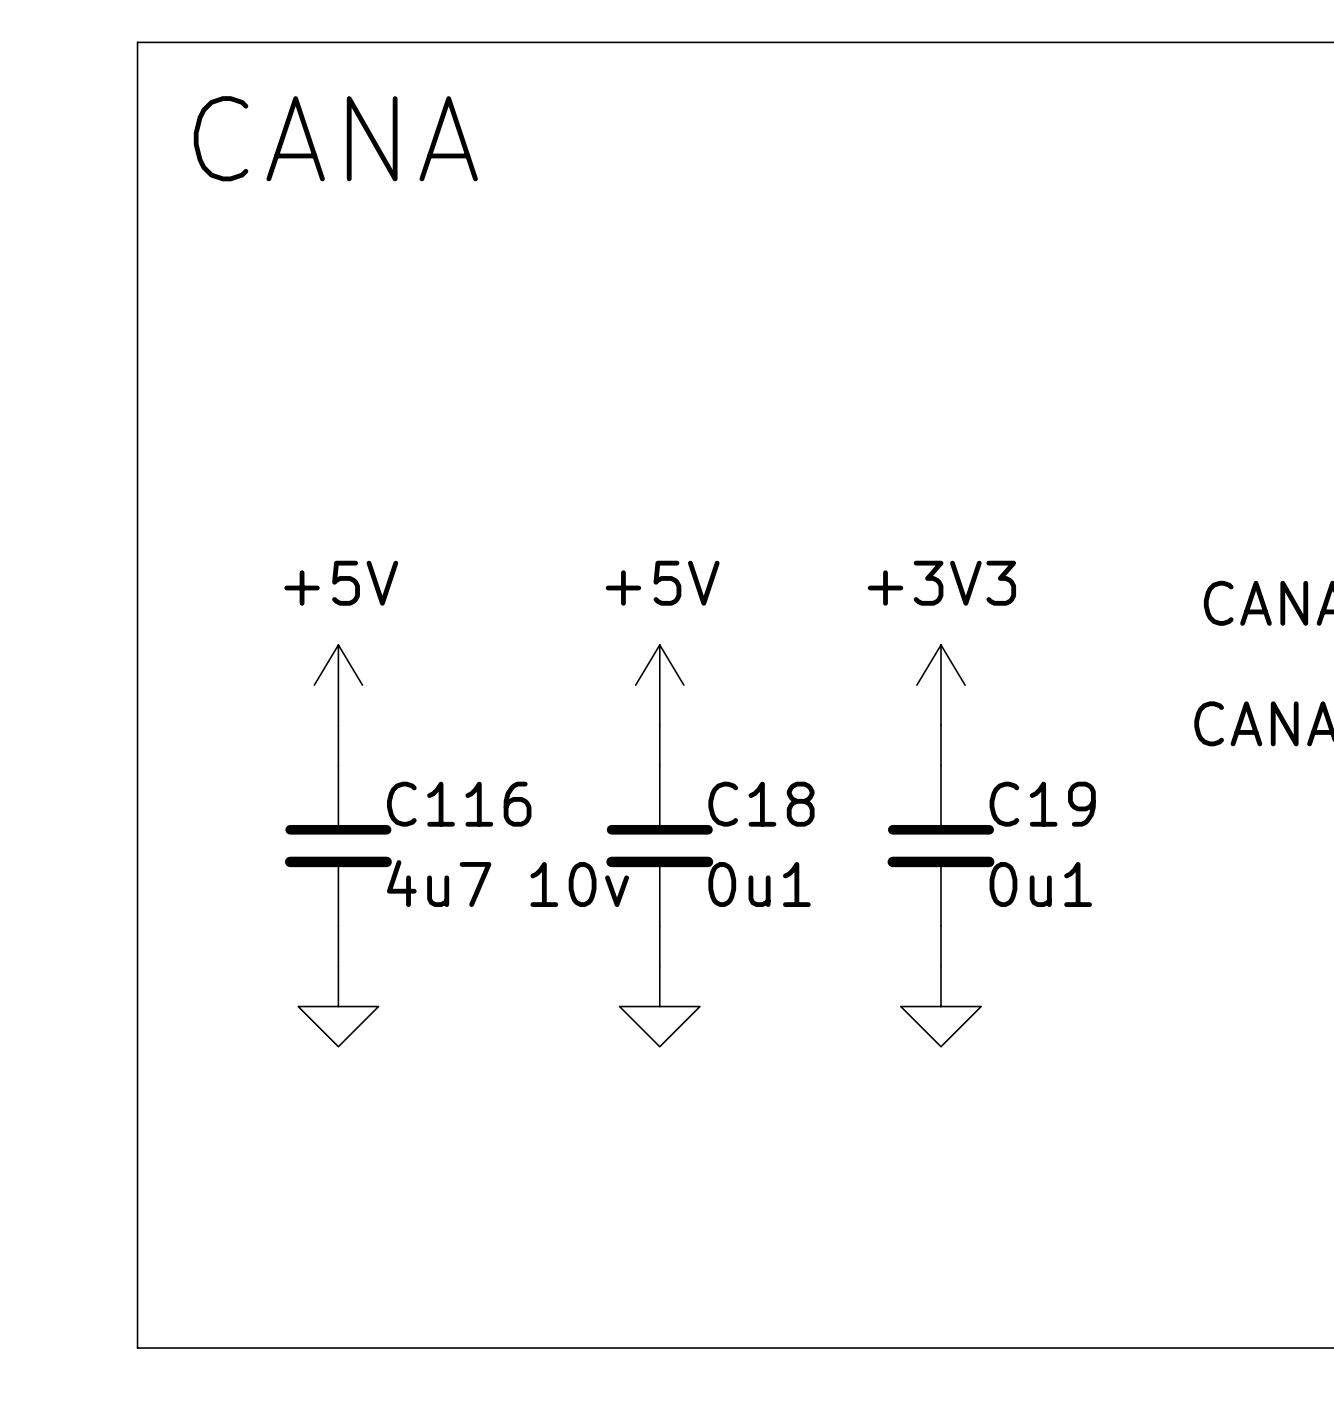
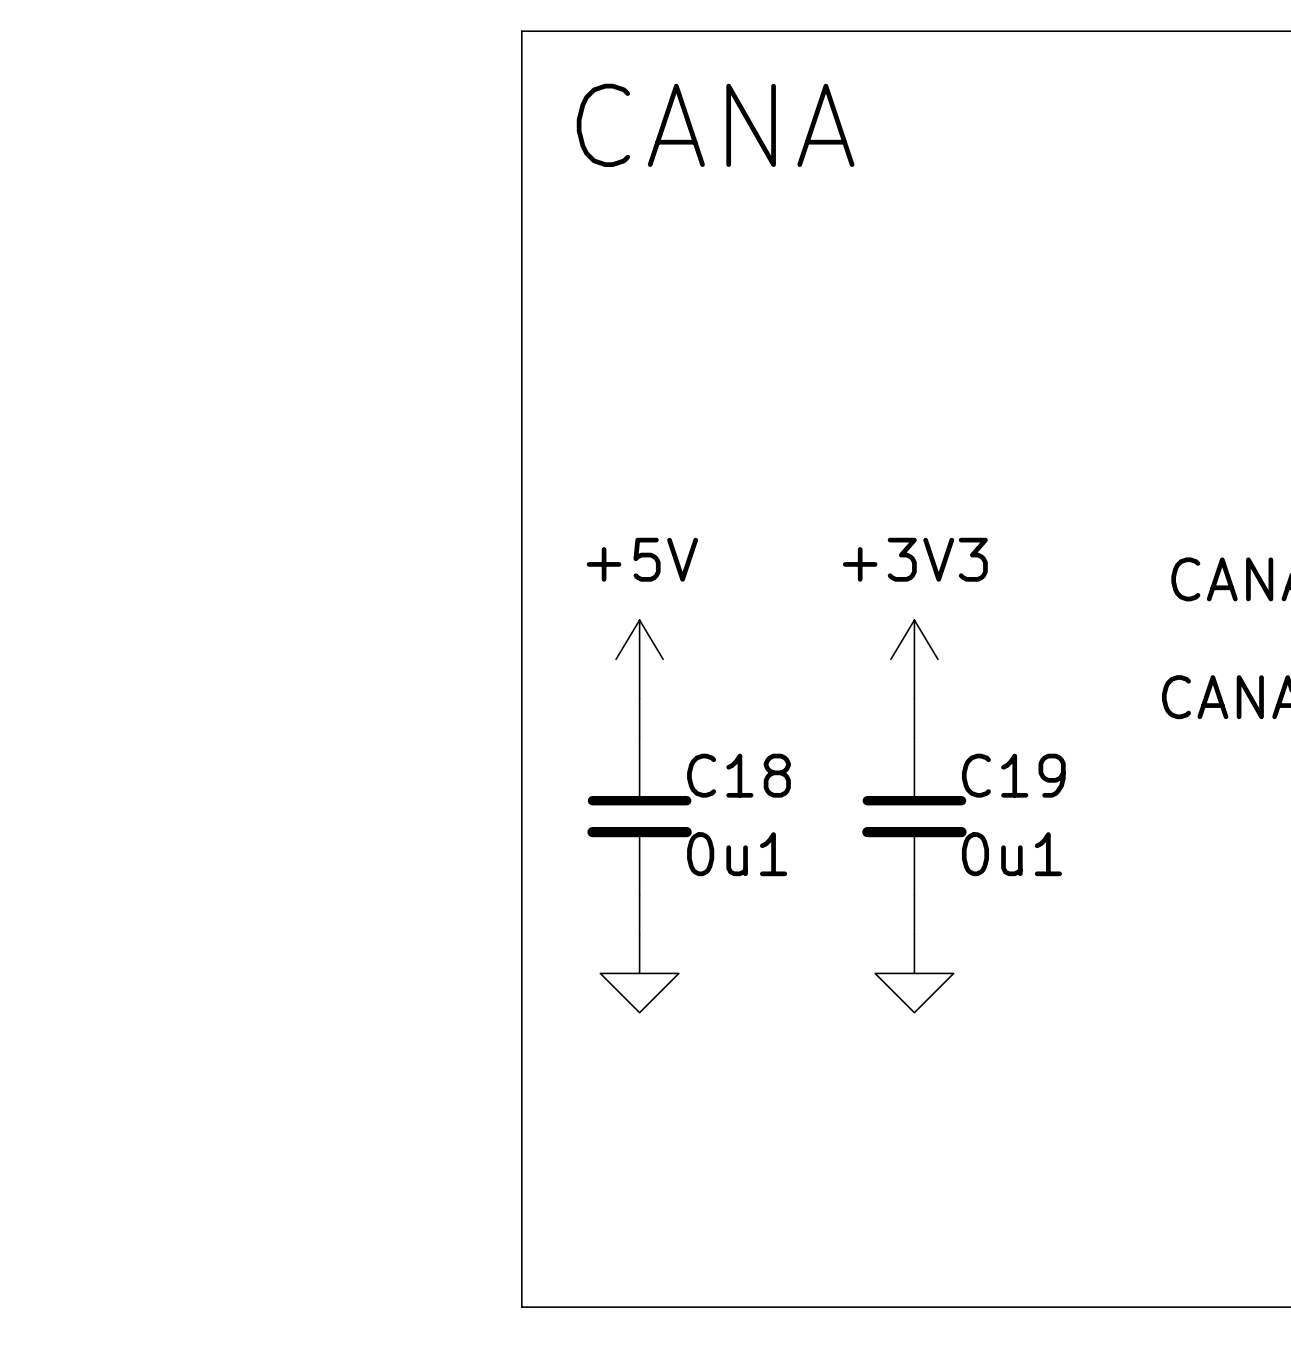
line: (539, 42) (137, 42) (137, 1348) (539, 1348) -> (521, 31) (521, 1307)
text position: CANA (335, 138) -> CANA (715, 125)
power symbol: +5V (338, 685) -> none
wire: (338, 725) (338, 765) -> none
C116: 4u7 10v (338, 845) -> none
wire: (338, 926) (338, 966) -> none
power symbol: (338, 1006) -> none

